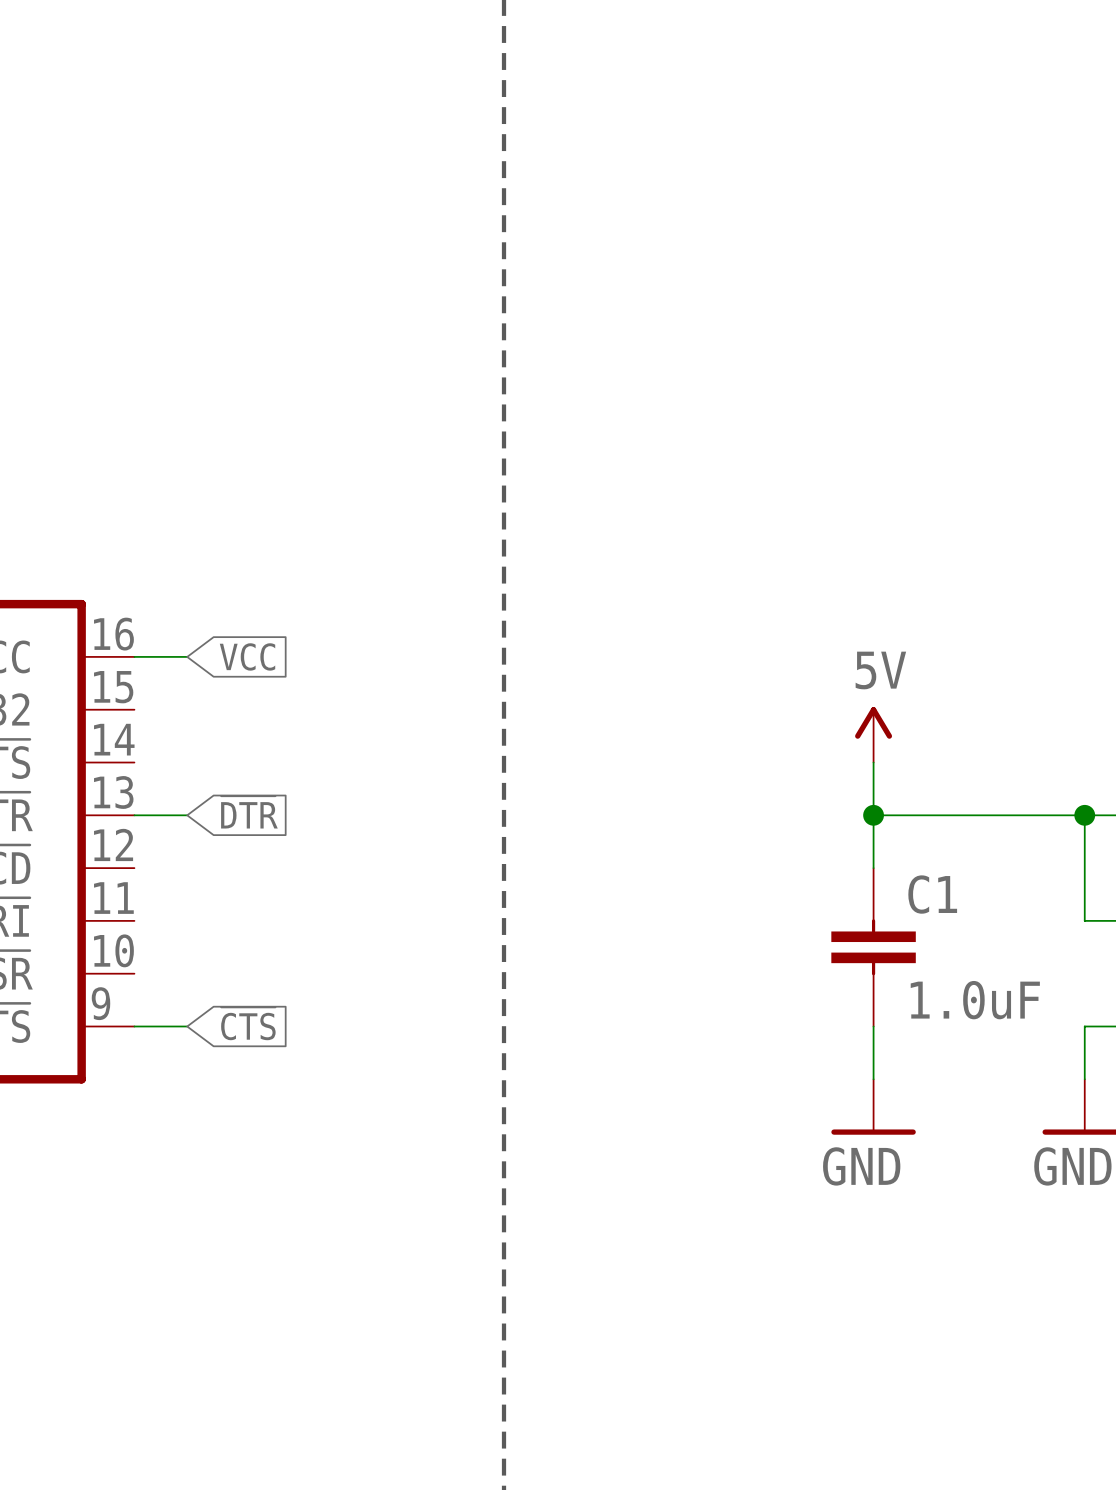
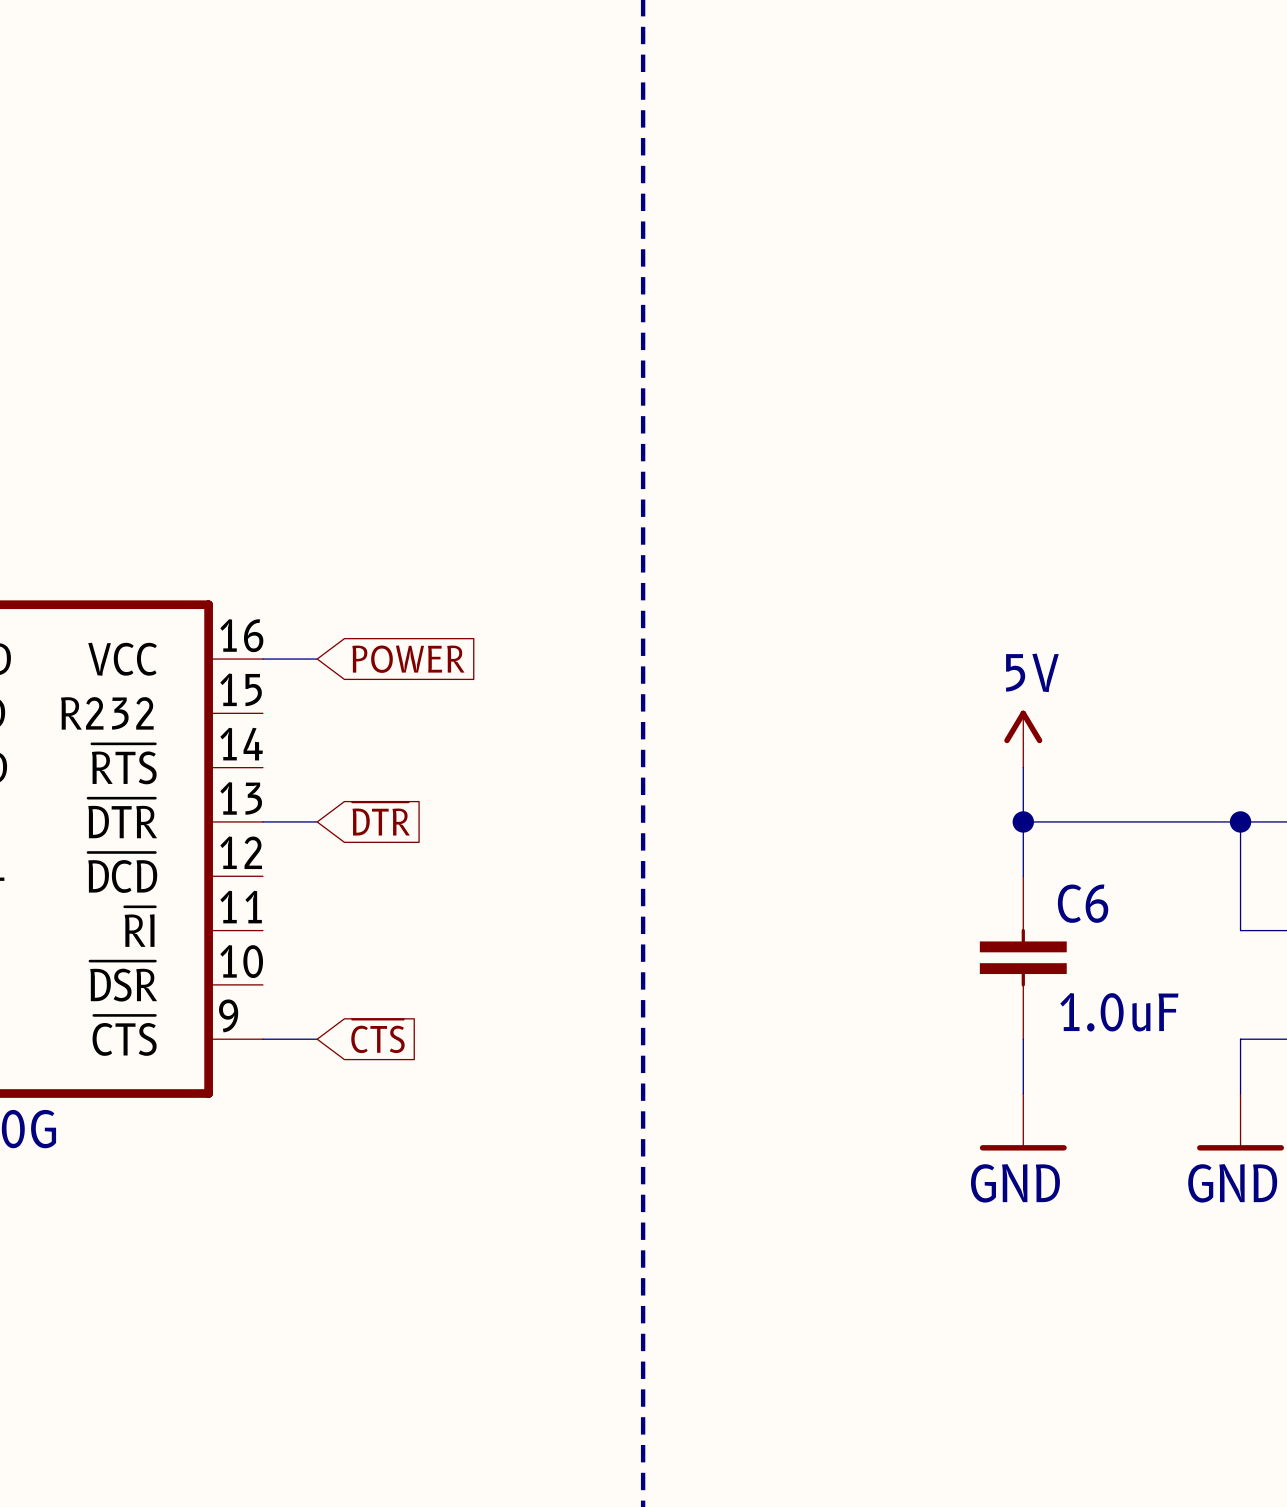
global label: VCC (247, 656) -> POWER (408, 659)
C1 name: C1 (932, 894) -> C6 (1083, 903)

